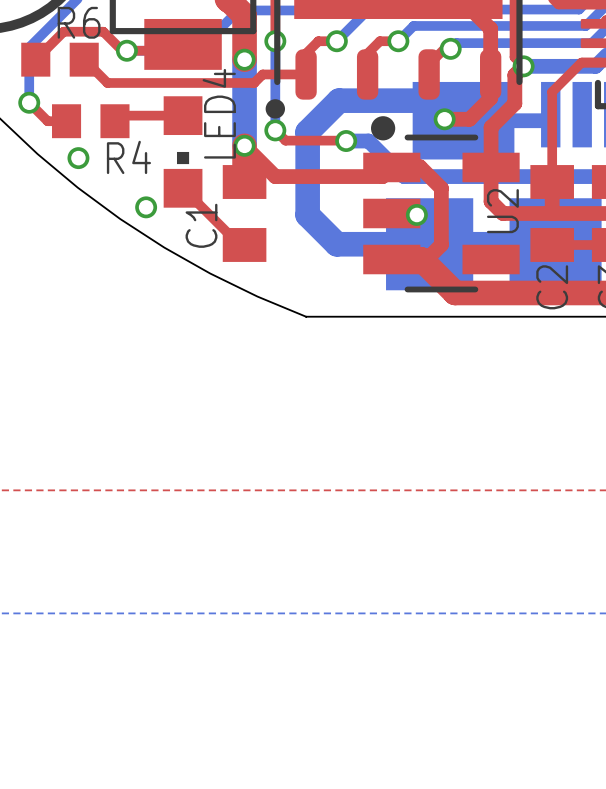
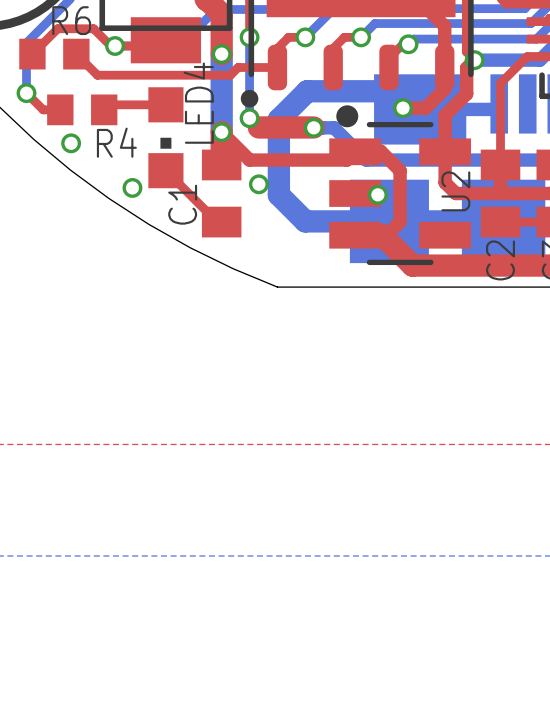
top track width: thin (285, 140) (346, 140) -> thick (258, 127) (313, 127)
via: none -> (258, 184)

